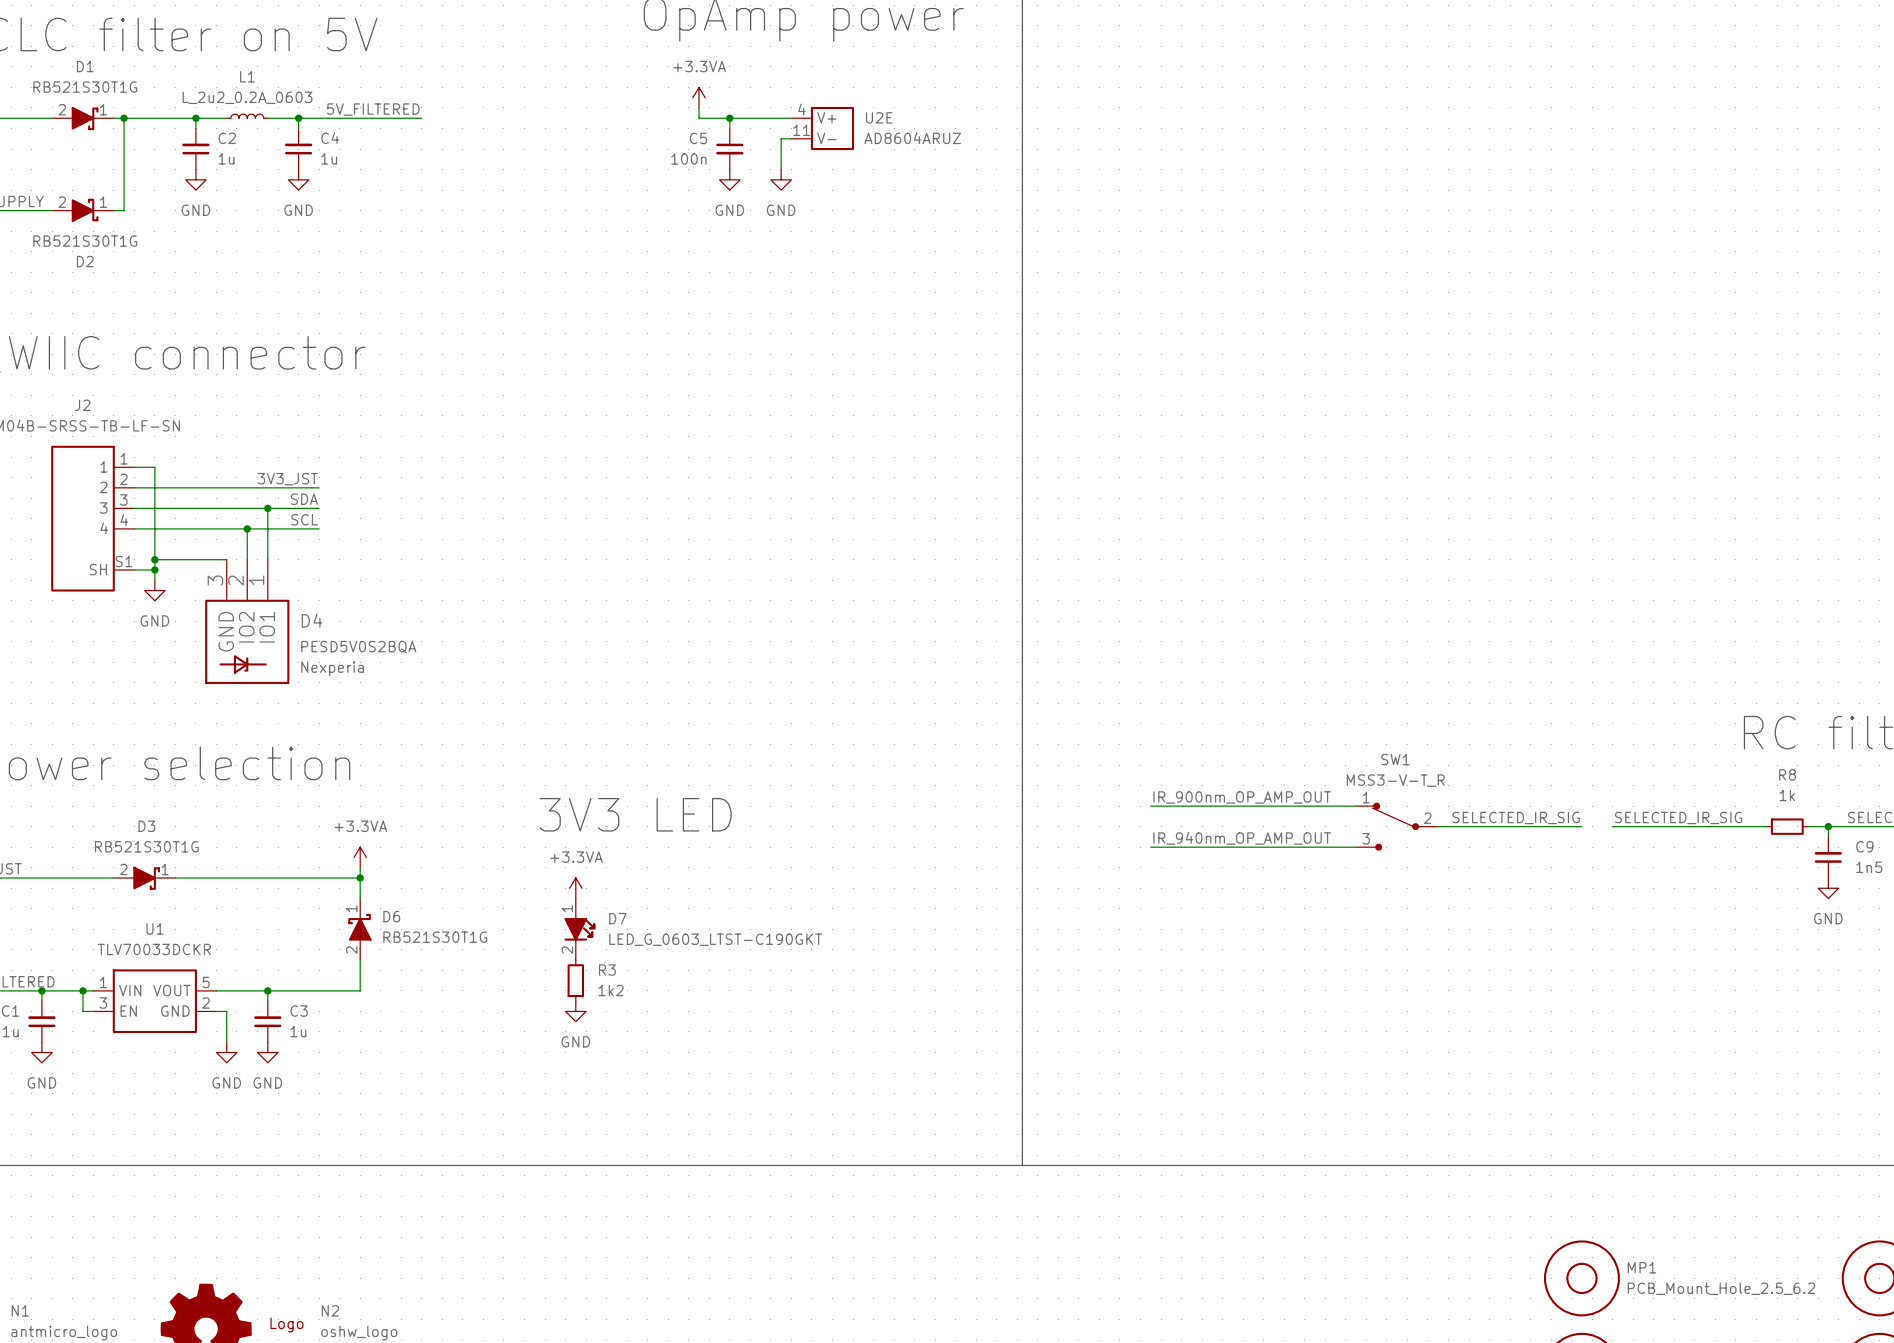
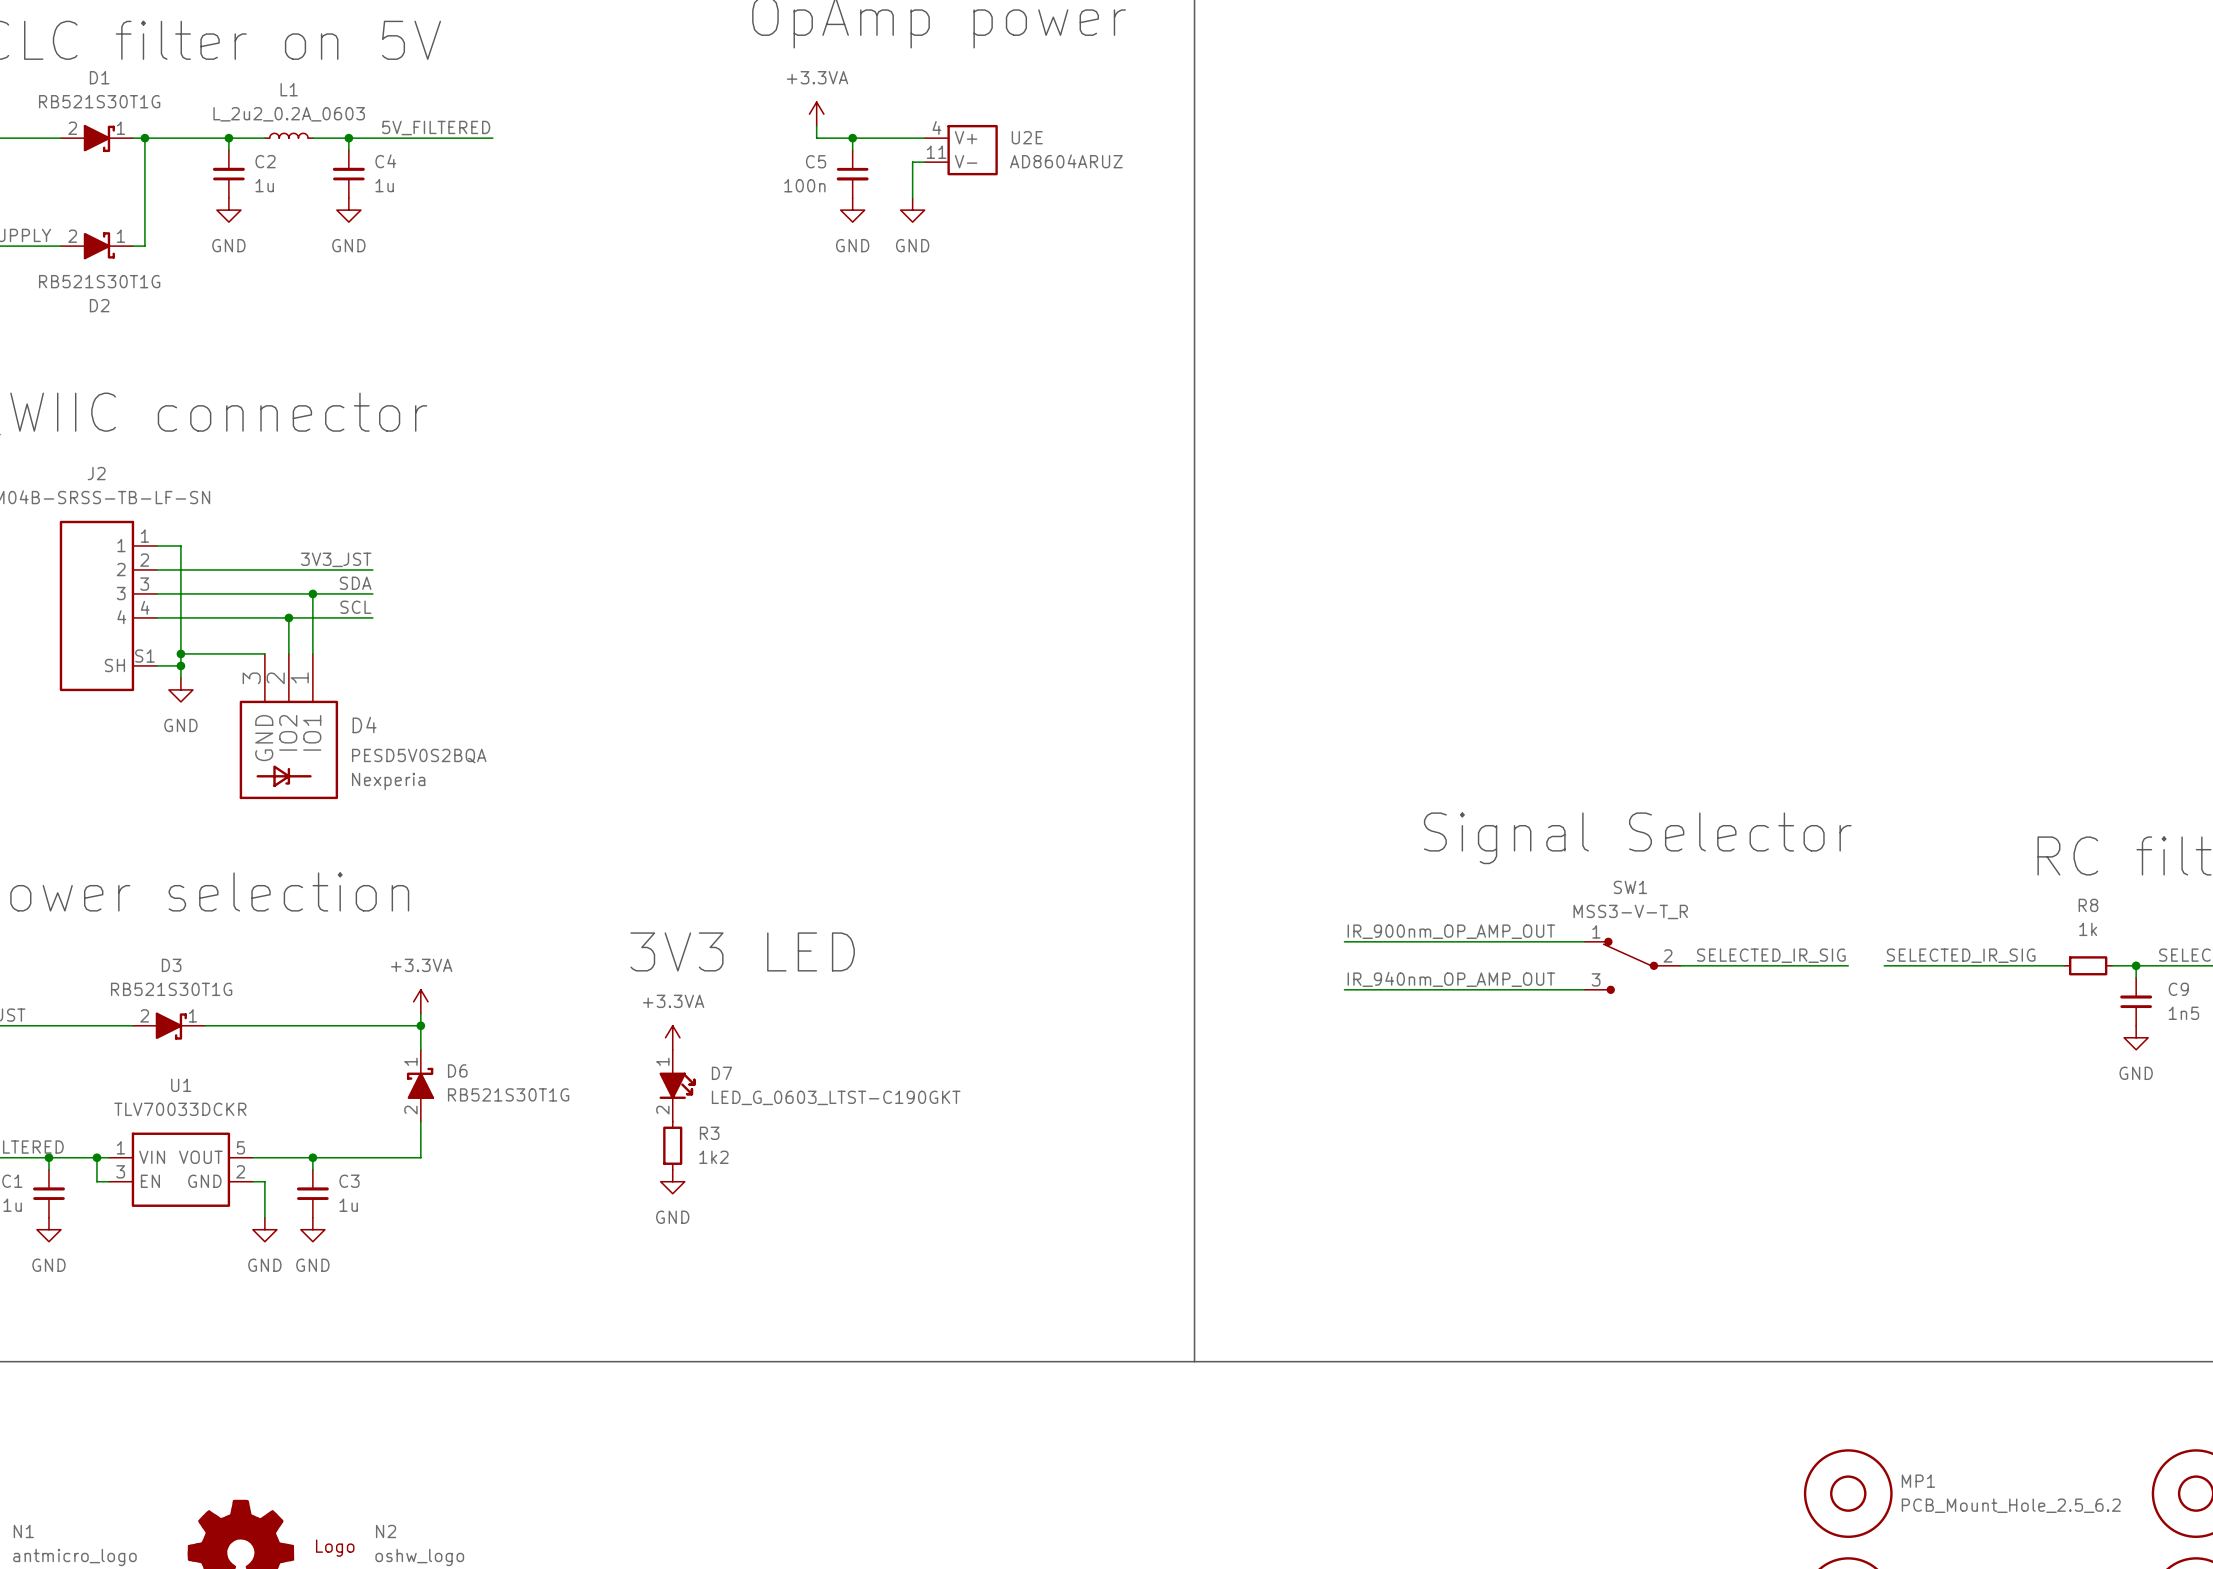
text: none -> Signal Selector (1637, 838)

